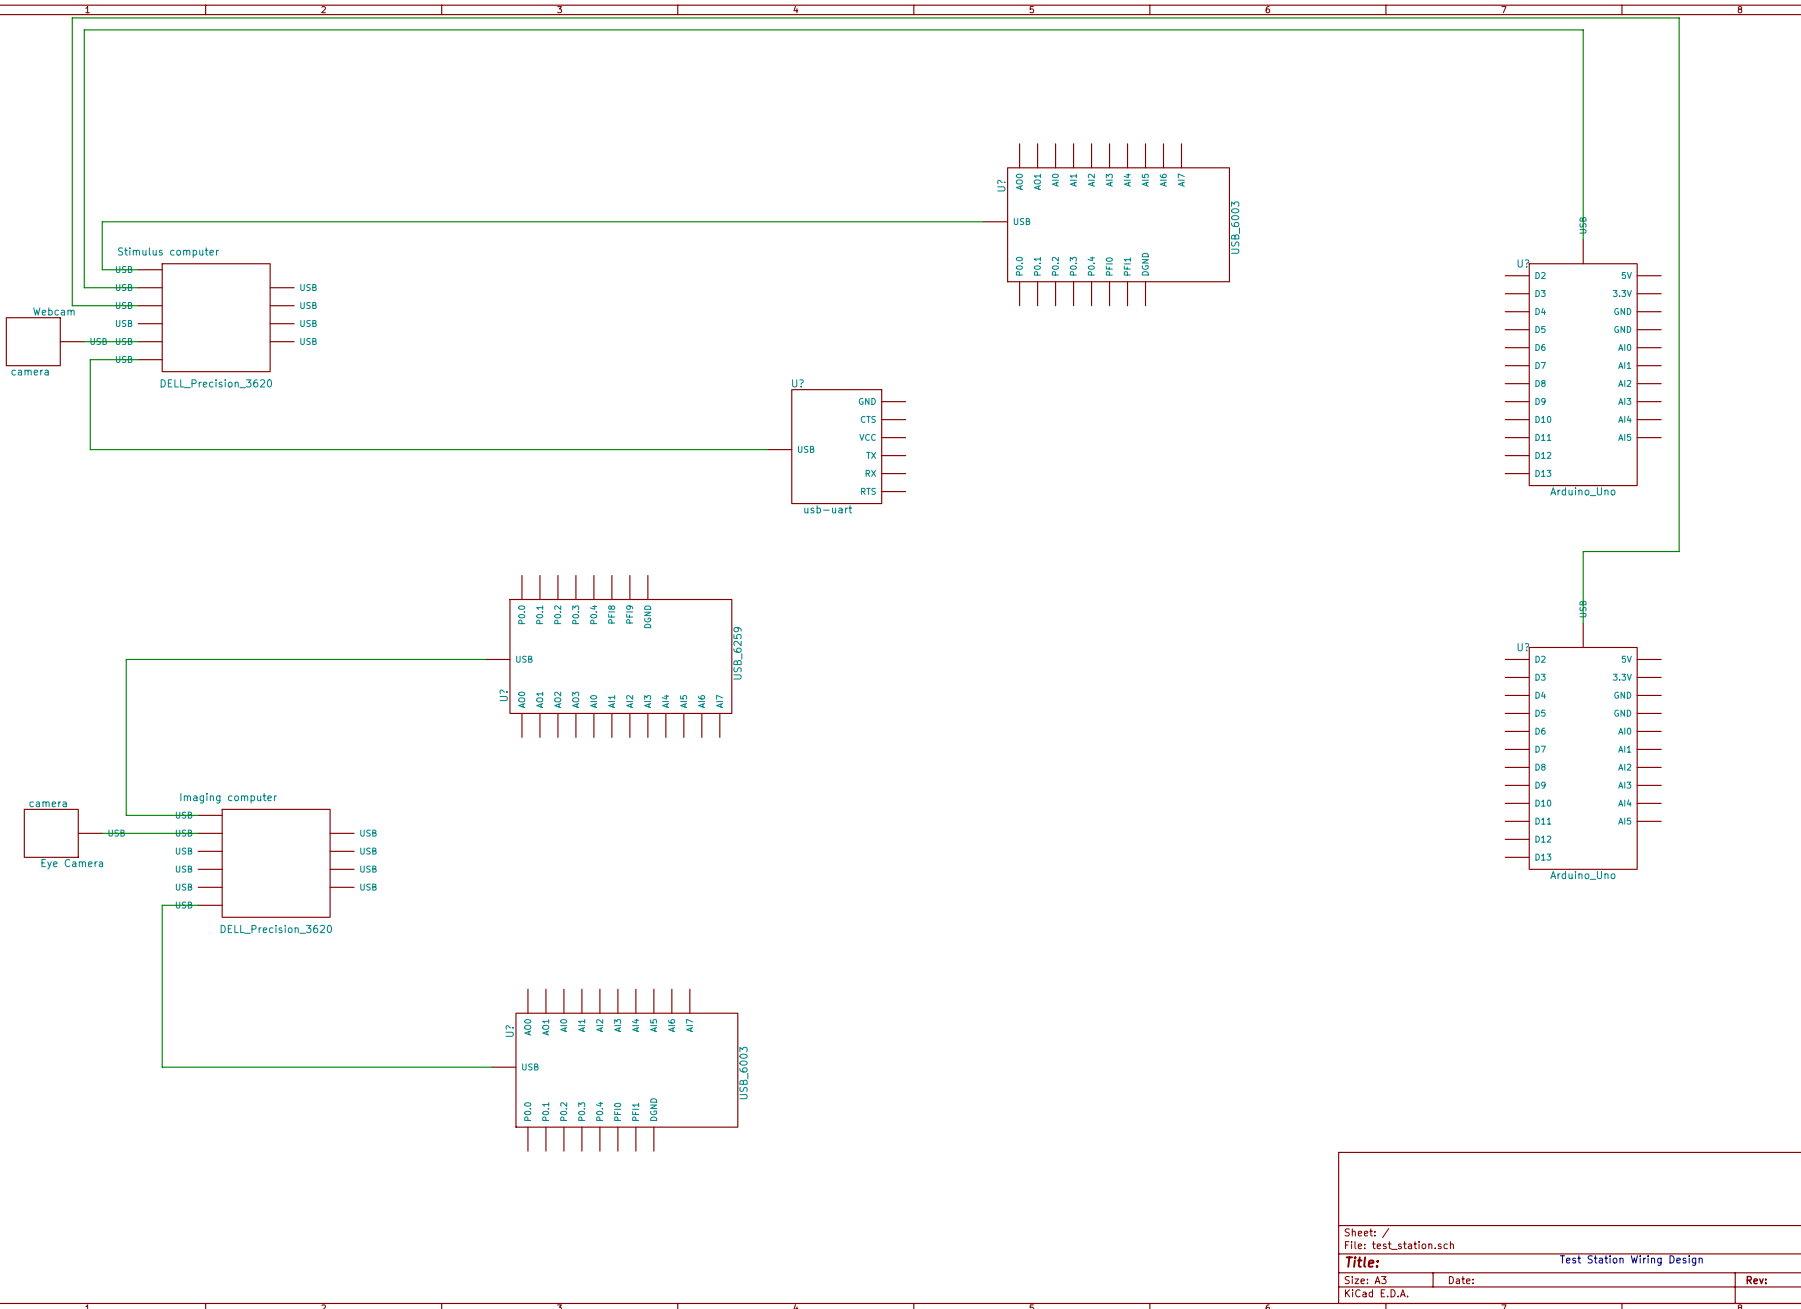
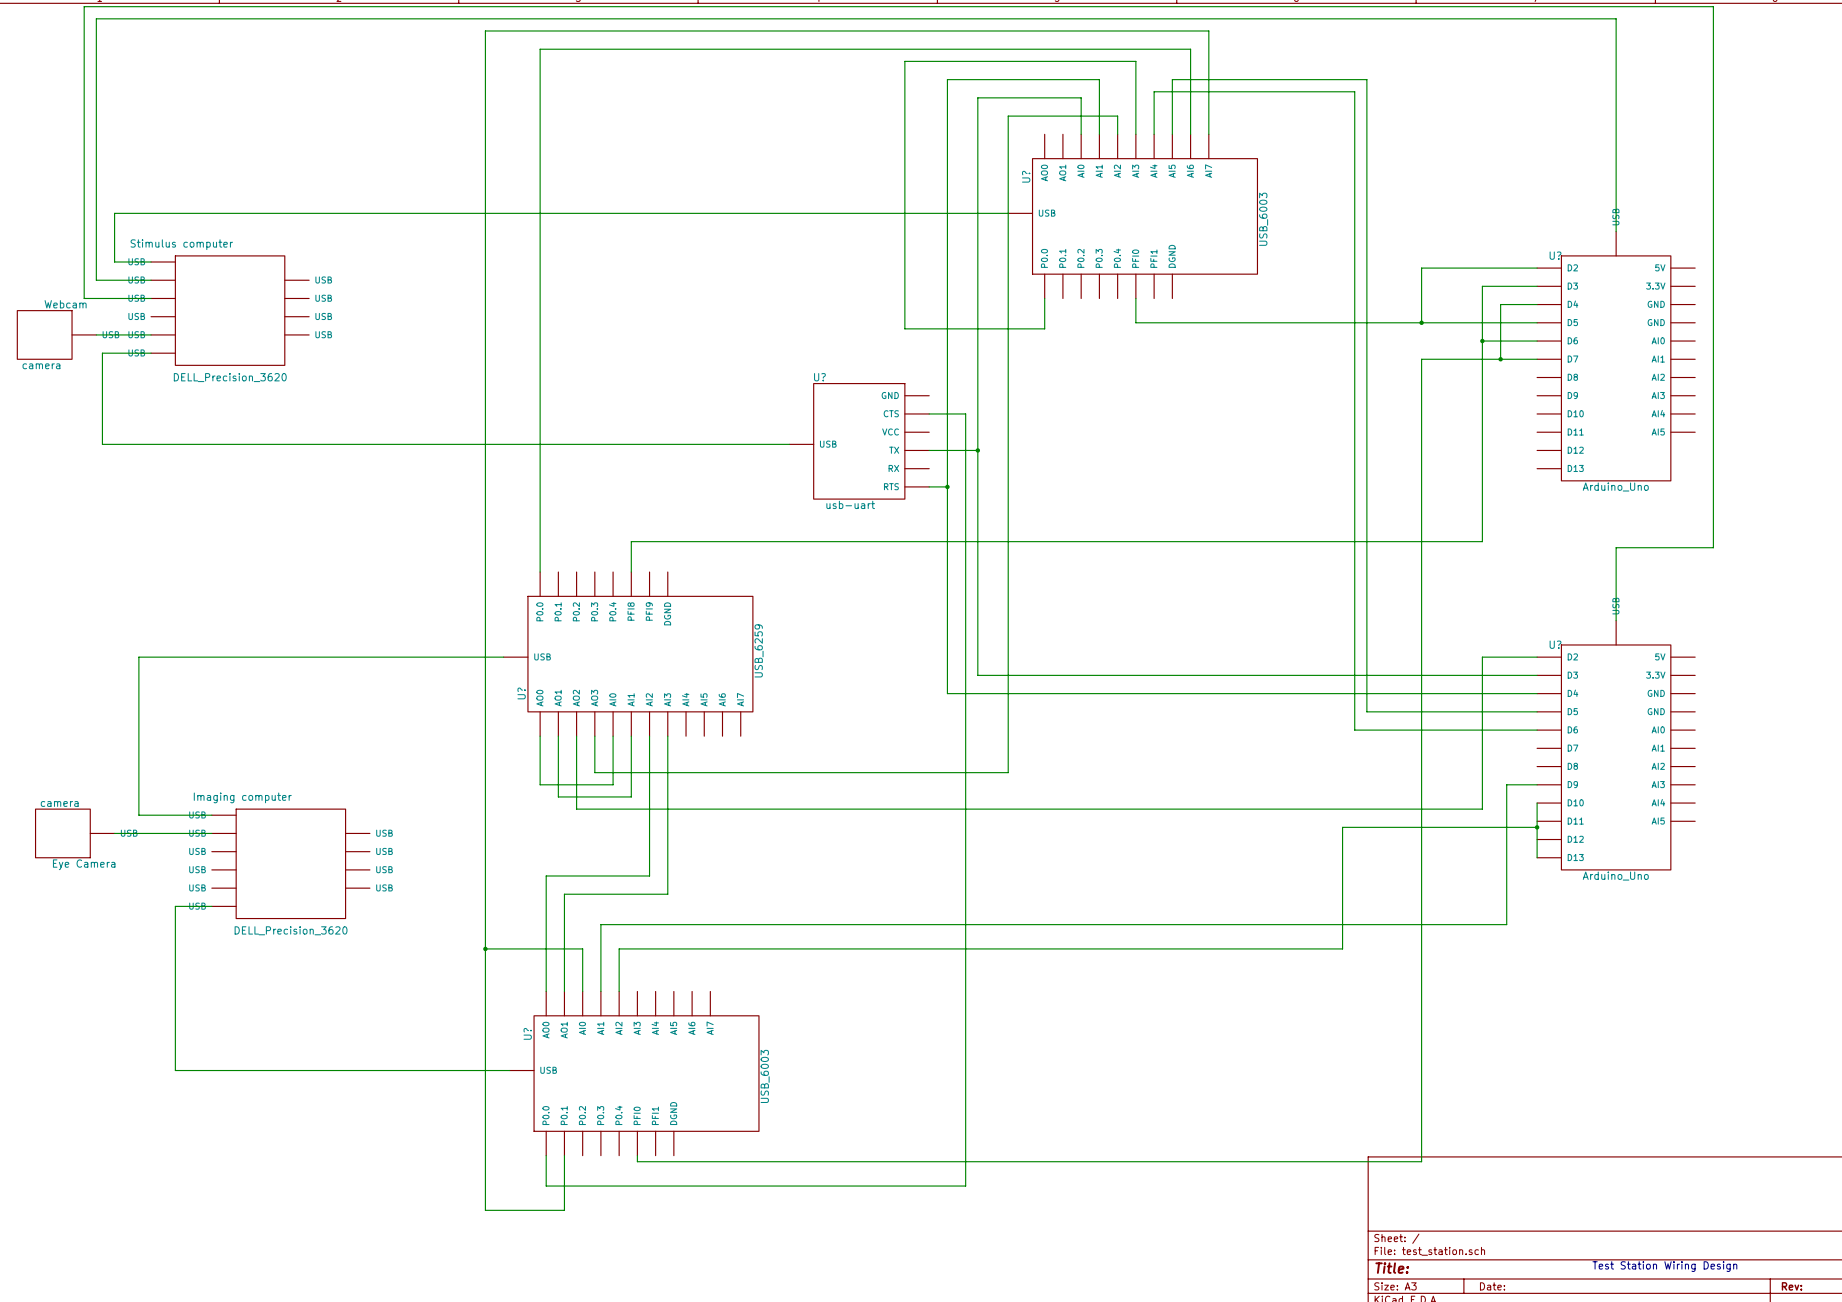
wire: none -> (1081, 134) (1081, 97) (977, 97) (977, 675) (1537, 675)
wire: none -> (1099, 134) (1099, 79) (947, 79) (947, 693) (1537, 693)
wire: none -> (1117, 134) (1117, 116) (1008, 116) (1008, 772) (594, 772) (594, 736)
wire: none -> (1135, 134) (1135, 61) (904, 61) (904, 328) (1044, 328) (1044, 298)
wire: none -> (1154, 134) (1154, 91) (1354, 91) (1354, 730) (1537, 730)
wire: none -> (1172, 134) (1172, 79) (1366, 79) (1366, 711) (1537, 711)
wire: none -> (1190, 134) (1190, 49) (540, 49) (540, 572)
wire: none -> (1208, 134) (1208, 30) (485, 30) (485, 1210) (564, 1210) (564, 1155)
wire: none -> (1537, 268) (1421, 268) (1421, 322)
wire: none -> (1537, 286) (1482, 286) (1482, 541) (631, 541) (631, 572)
wire: none -> (1135, 298) (1135, 322) (1537, 322)
wire: none -> (1537, 304) (1500, 304) (1500, 359)
junction: none -> (1421, 322)
wire: none -> (1482, 341) (1537, 341)
junction: none -> (1482, 341)
junction: none -> (1500, 359)
wire: none -> (1537, 359) (1421, 359) (1421, 1161) (637, 1161) (637, 1155)
wire: none -> (929, 413) (965, 413) (965, 1186) (546, 1186) (546, 1155)
wire: none -> (929, 450) (977, 450)
junction: none -> (977, 450)
wire: none -> (929, 486) (947, 486)
junction: none -> (947, 486)
wire: none -> (1537, 657) (1482, 657) (1482, 809) (576, 809) (576, 736)
wire: none -> (540, 736) (540, 784) (613, 784) (613, 736)
wire: none -> (558, 736) (558, 796) (631, 796) (631, 736)
wire: none -> (649, 736) (649, 875) (546, 875) (546, 991)
wire: none -> (667, 736) (667, 894) (564, 894) (564, 991)
wire: none -> (1537, 784) (1506, 784) (1506, 924) (600, 924) (600, 991)
wire: none -> (1537, 803) (1537, 857)
wire: none -> (1537, 827) (1342, 827) (1342, 948) (619, 948) (619, 991)
junction: none -> (1537, 827)
wire: none -> (485, 948) (582, 948) (582, 991)
junction: none -> (485, 948)

